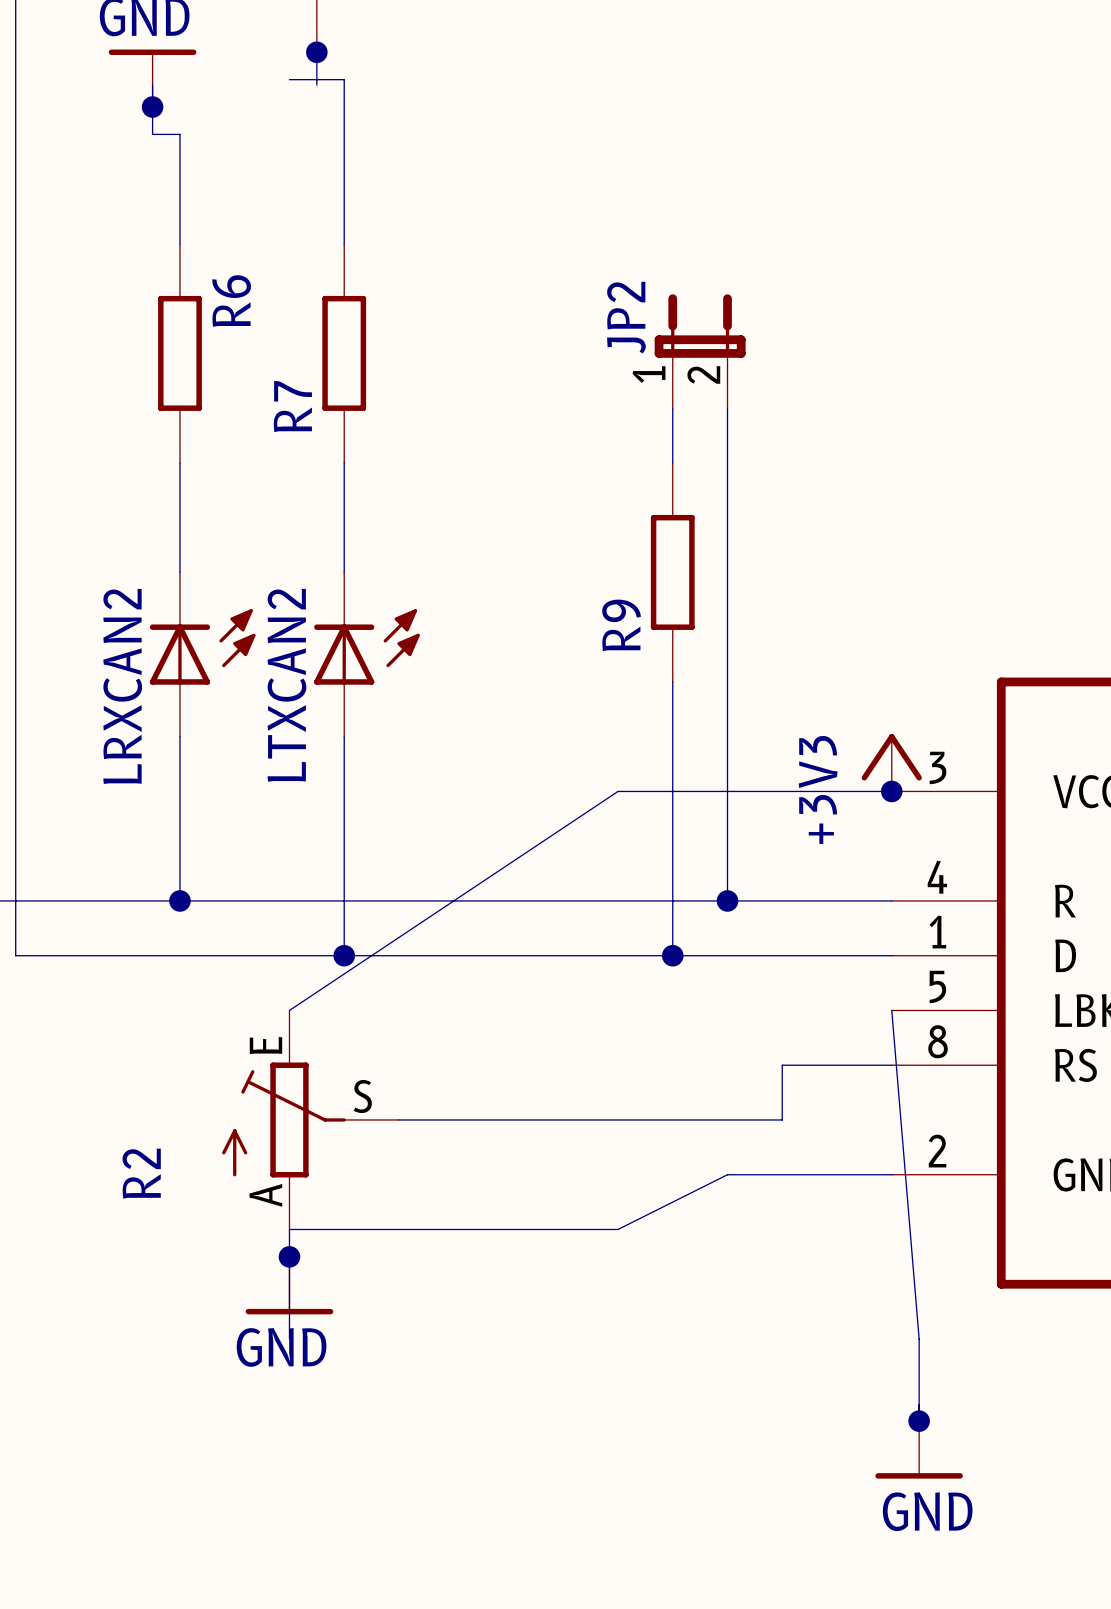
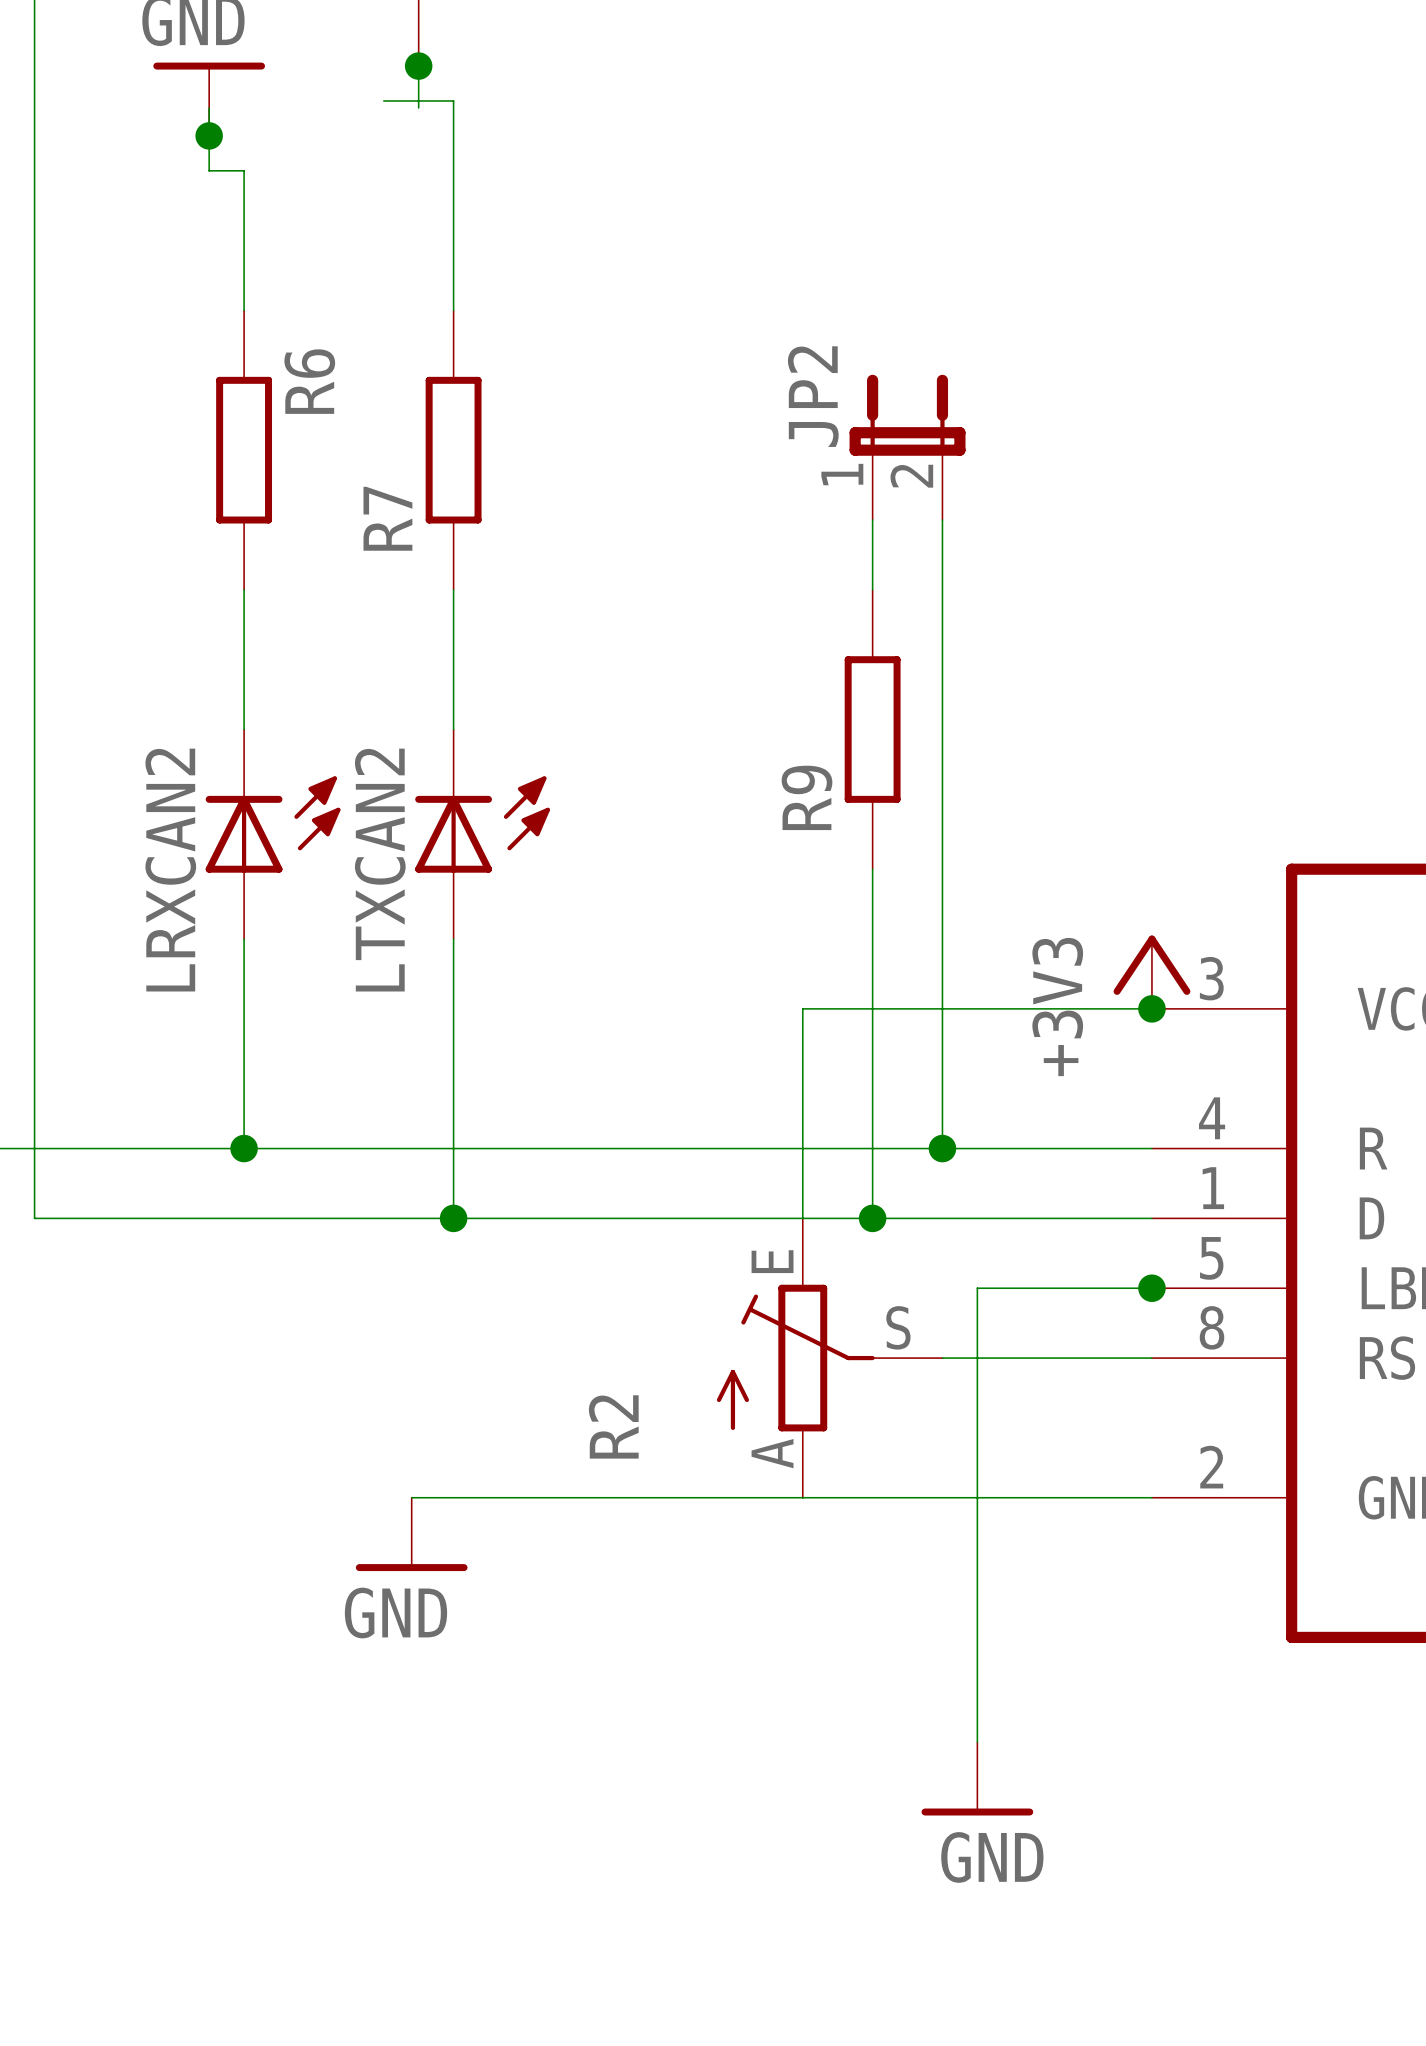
wire: (617, 791) (289, 1010) -> (802, 1008) (802, 1218)
wire: (891, 1010) (919, 1339) (919, 1421) -> (1151, 1288) (977, 1288) (977, 1742)
junction: none -> (1151, 1288)
wire: (782, 1065) (782, 1119) (398, 1119) -> (1012, 1358) (942, 1358)
R2 position: (310, 1119) -> (829, 1358)
wire: (727, 1174) (617, 1229) (289, 1229) (289, 1339) -> (942, 1497) (411, 1497)
junction: (289, 1256) -> none
power symbol position: GND (289, 1285) -> GND (411, 1534)
junction: (919, 1421) -> none
power symbol position: GND (919, 1449) -> GND (977, 1778)

